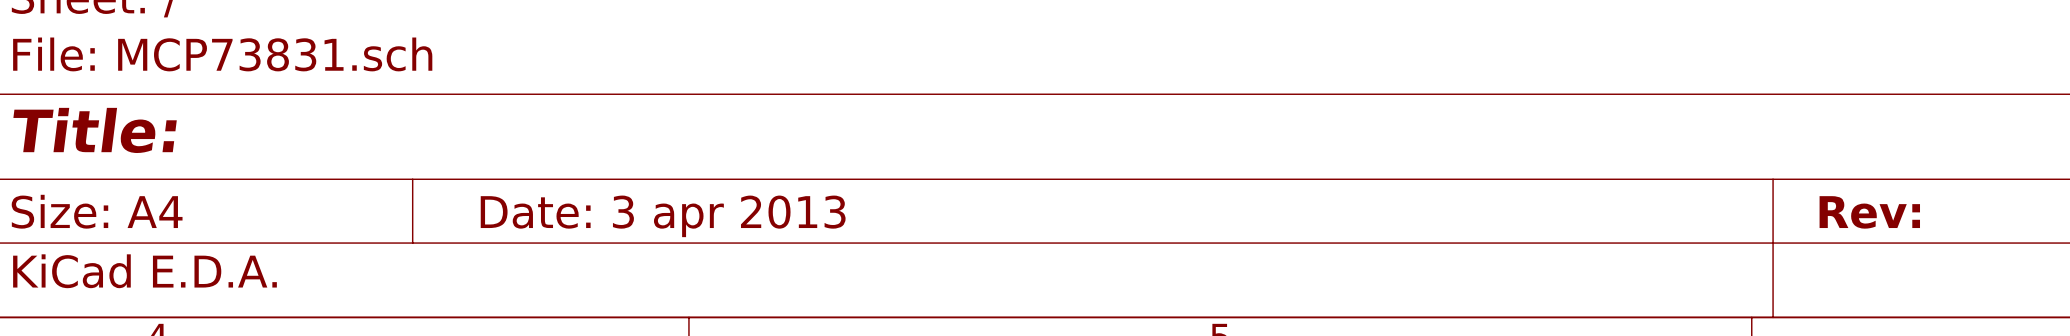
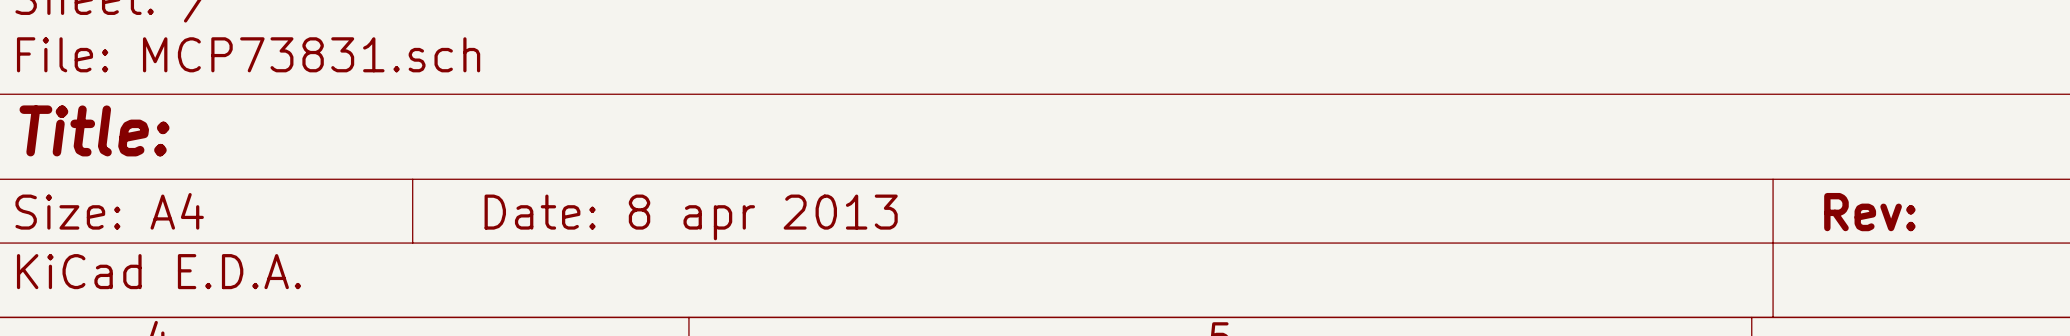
title block: Date: 3 apr 2013 (663, 216) -> Date: 8 apr 2013 (691, 217)

